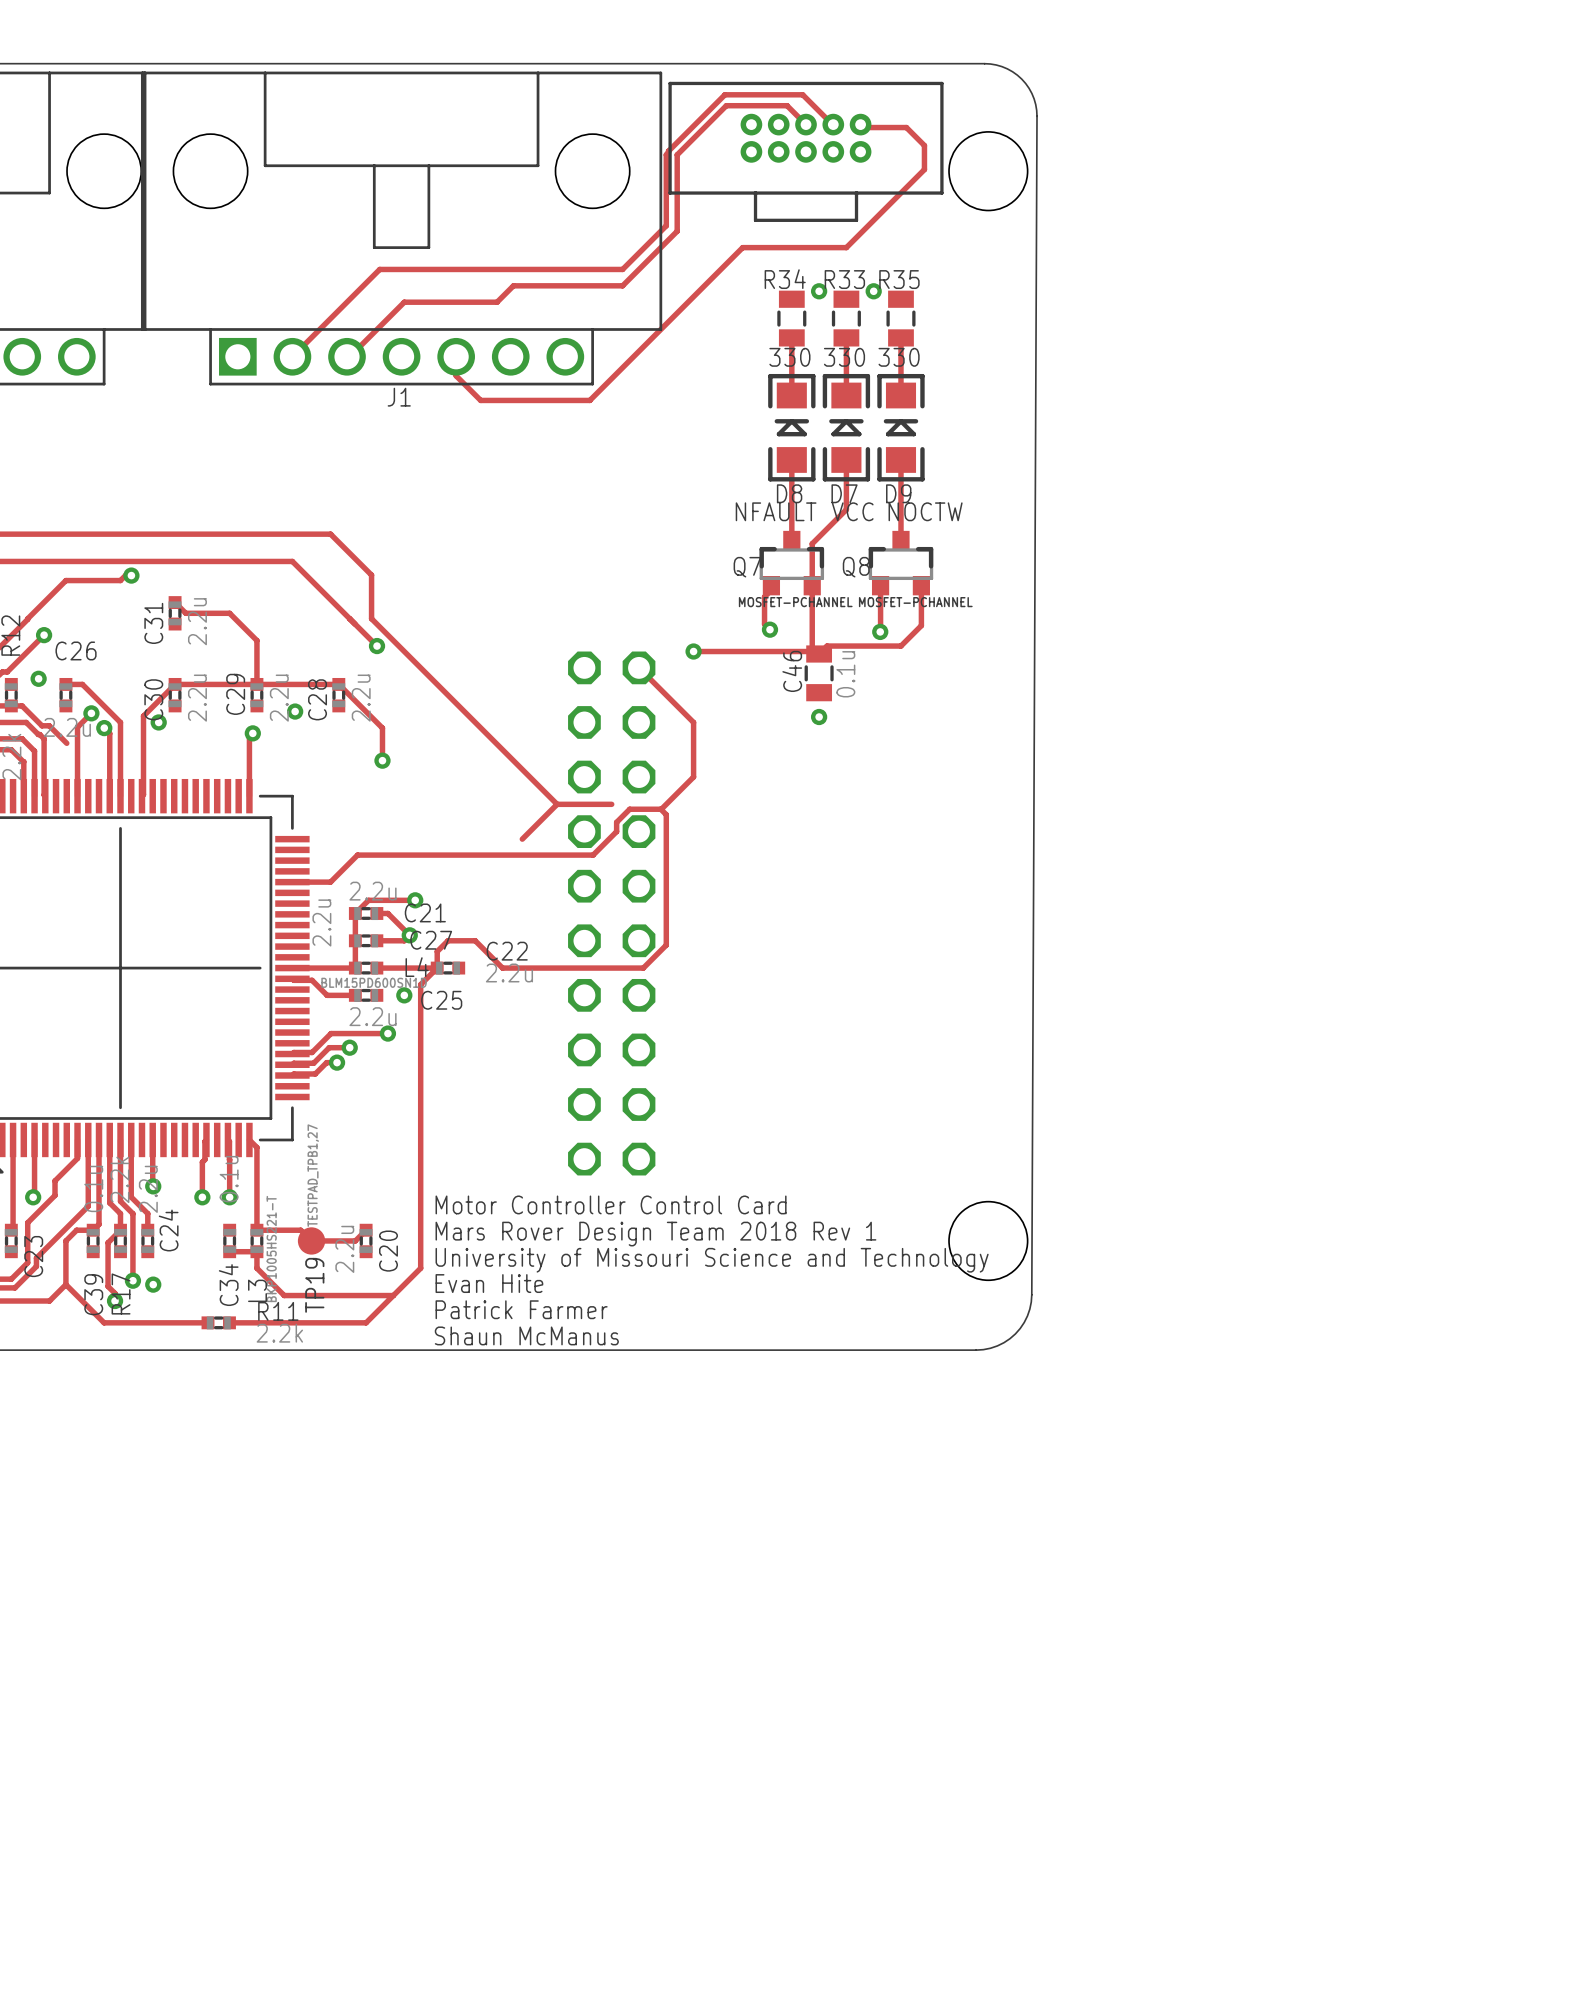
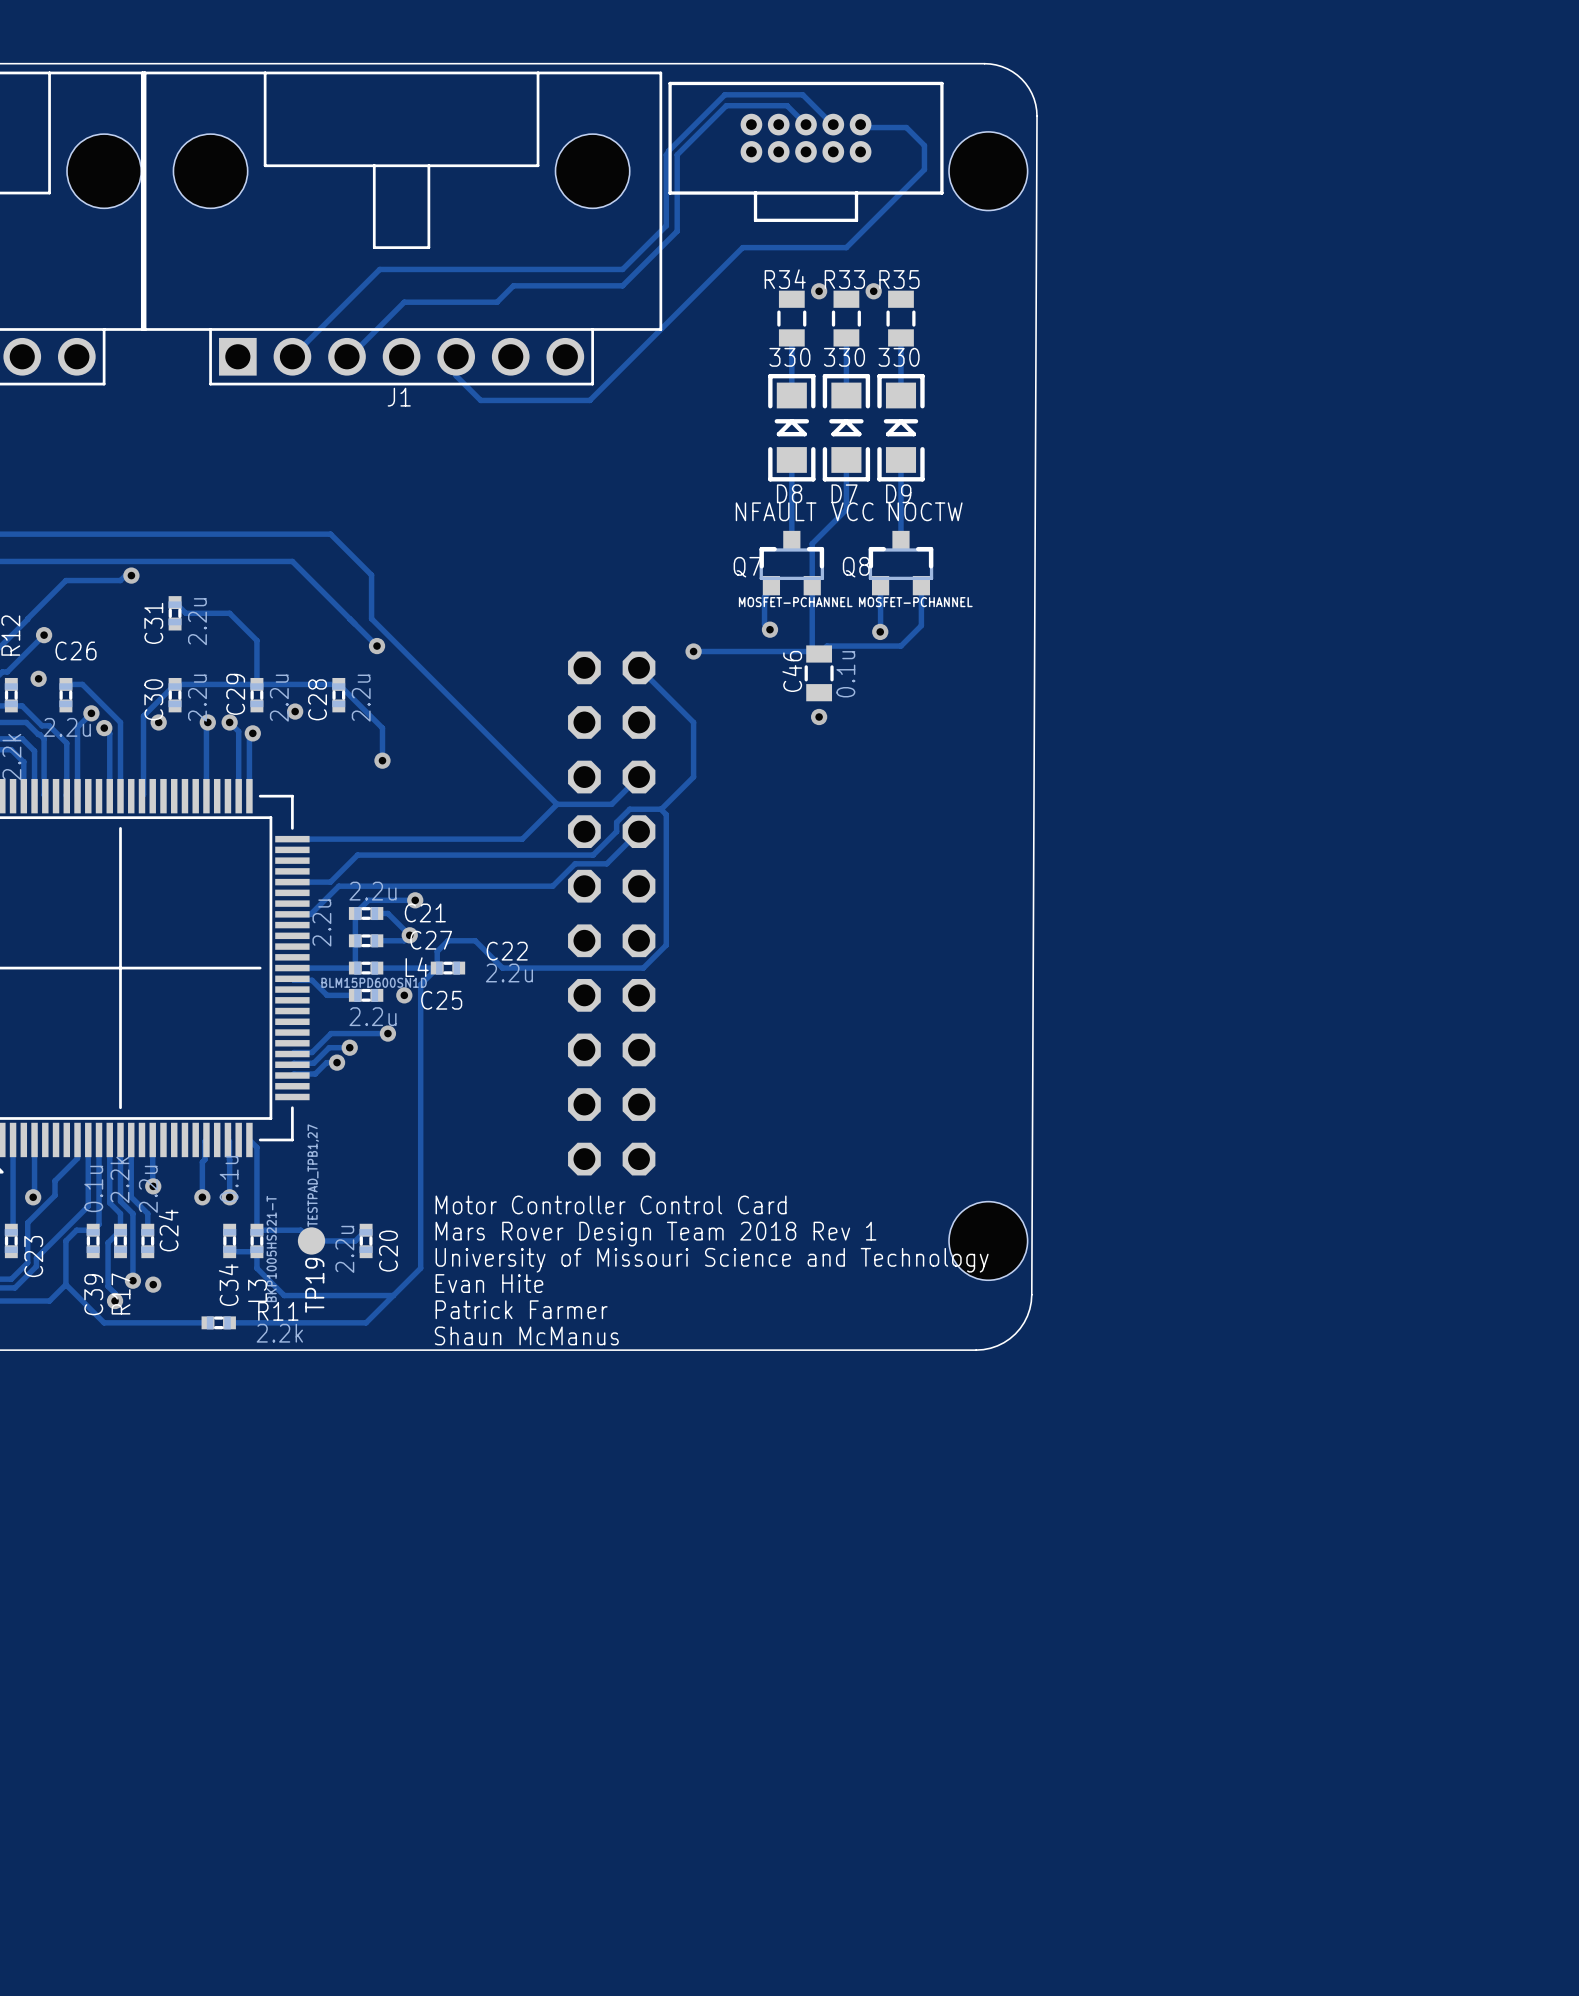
track: none -> (207, 722) (206, 796)
via: none -> (207, 722)
track: none -> (229, 722) (238, 731) (238, 796)
via: none -> (229, 722)
track: none -> (66, 743) (65, 795)
track: none -> (639, 777) (611, 804)
track: none -> (639, 831) (606, 863) (575, 863) (552, 886) (338, 886) (310, 914) (292, 914)
track: none -> (292, 839) (522, 839)

